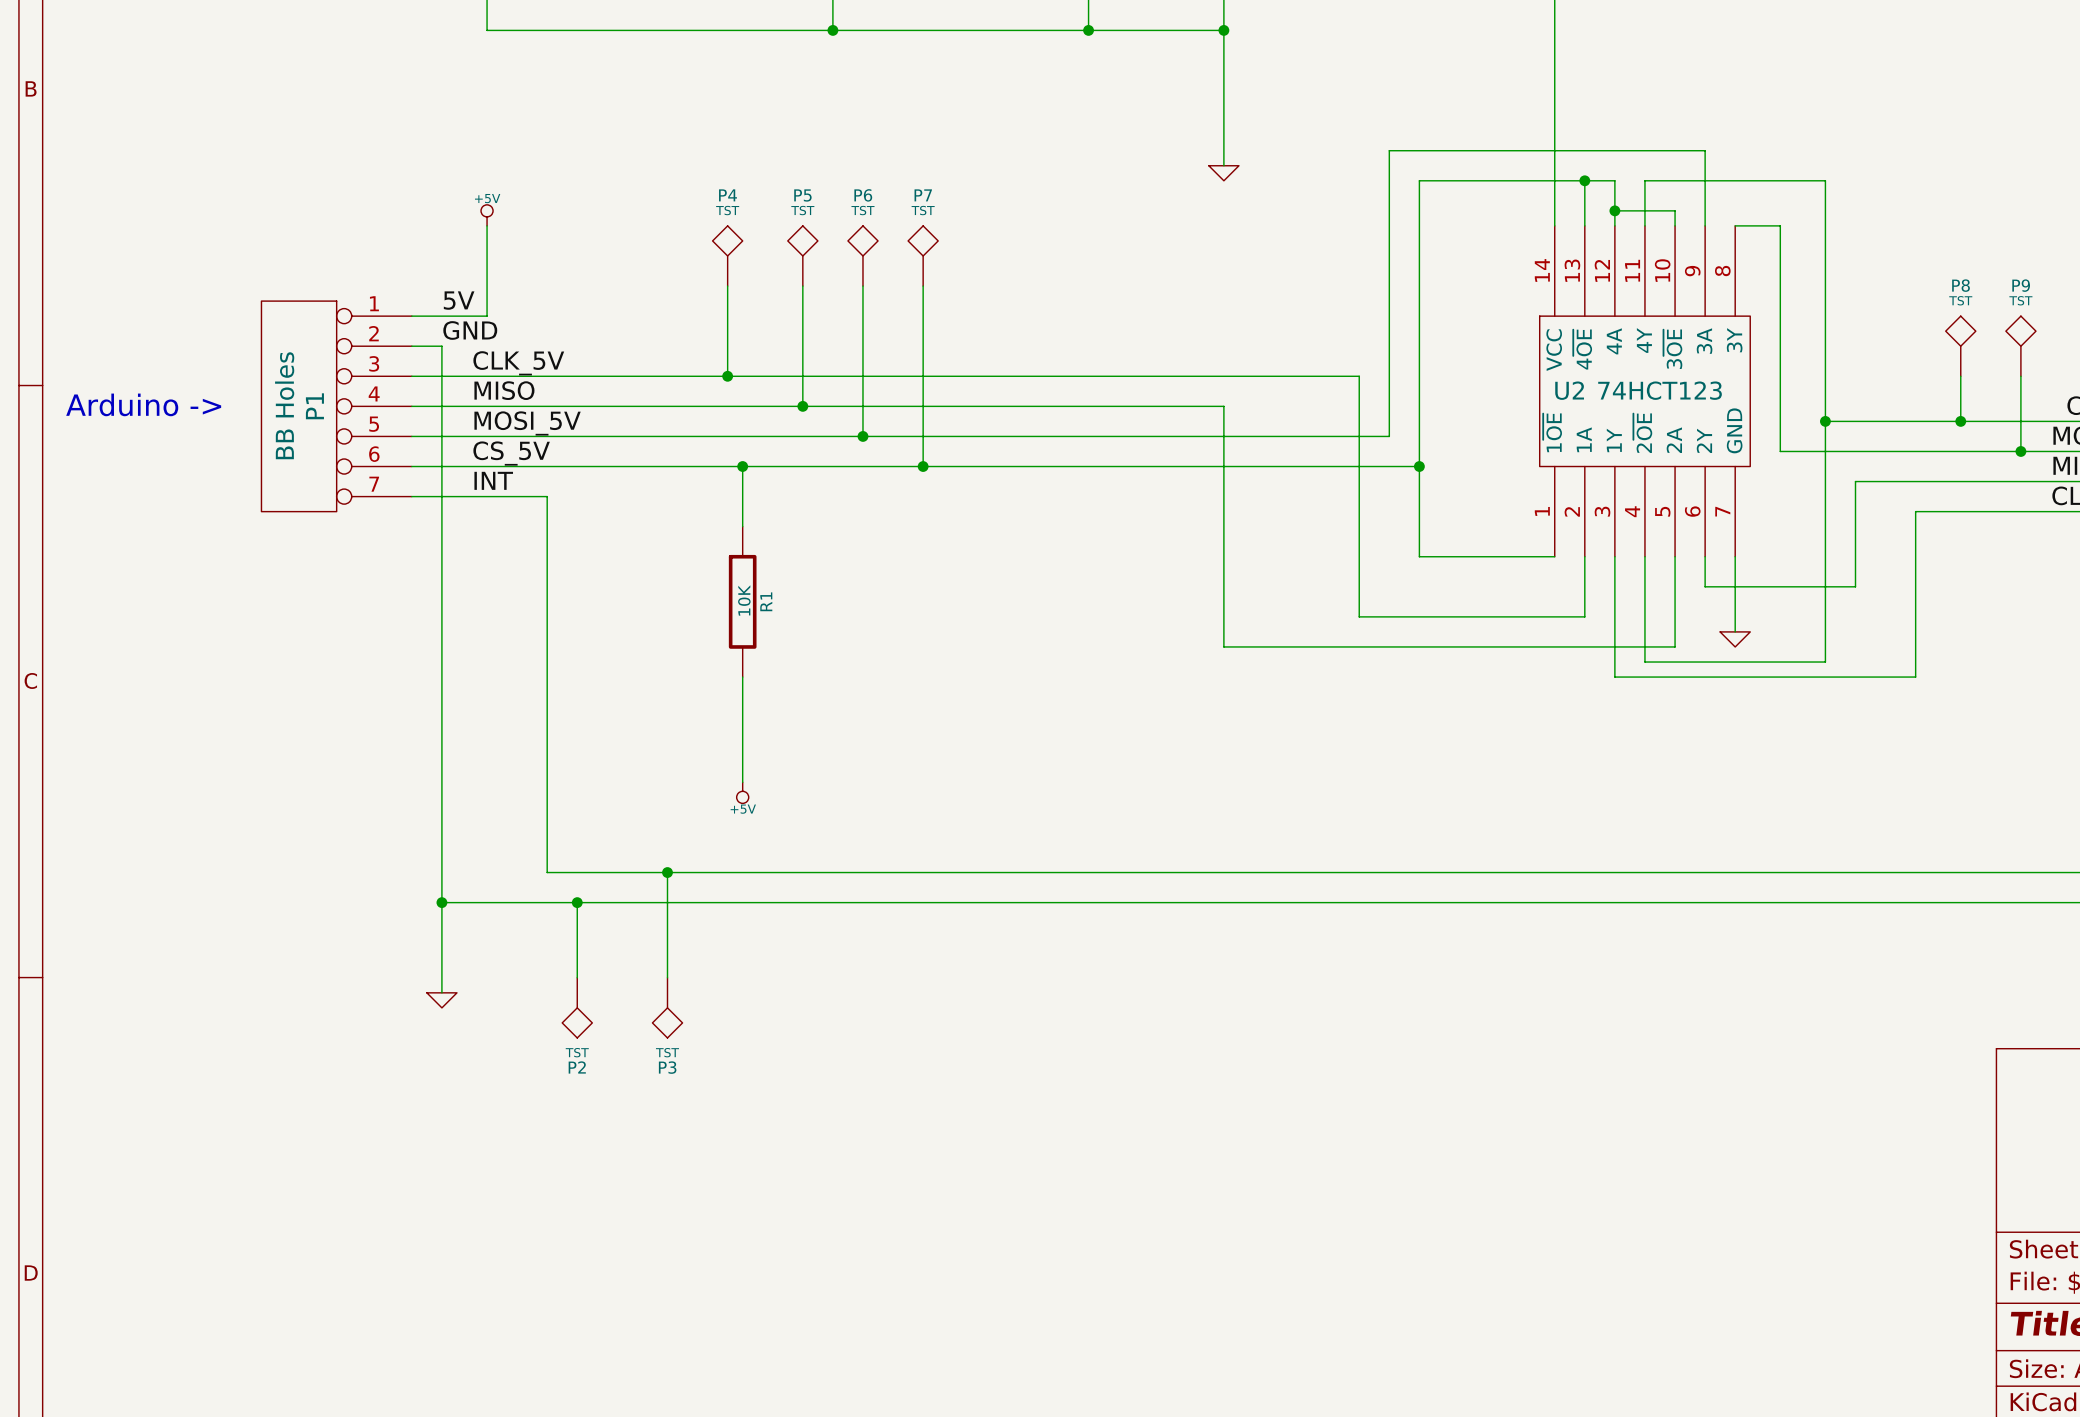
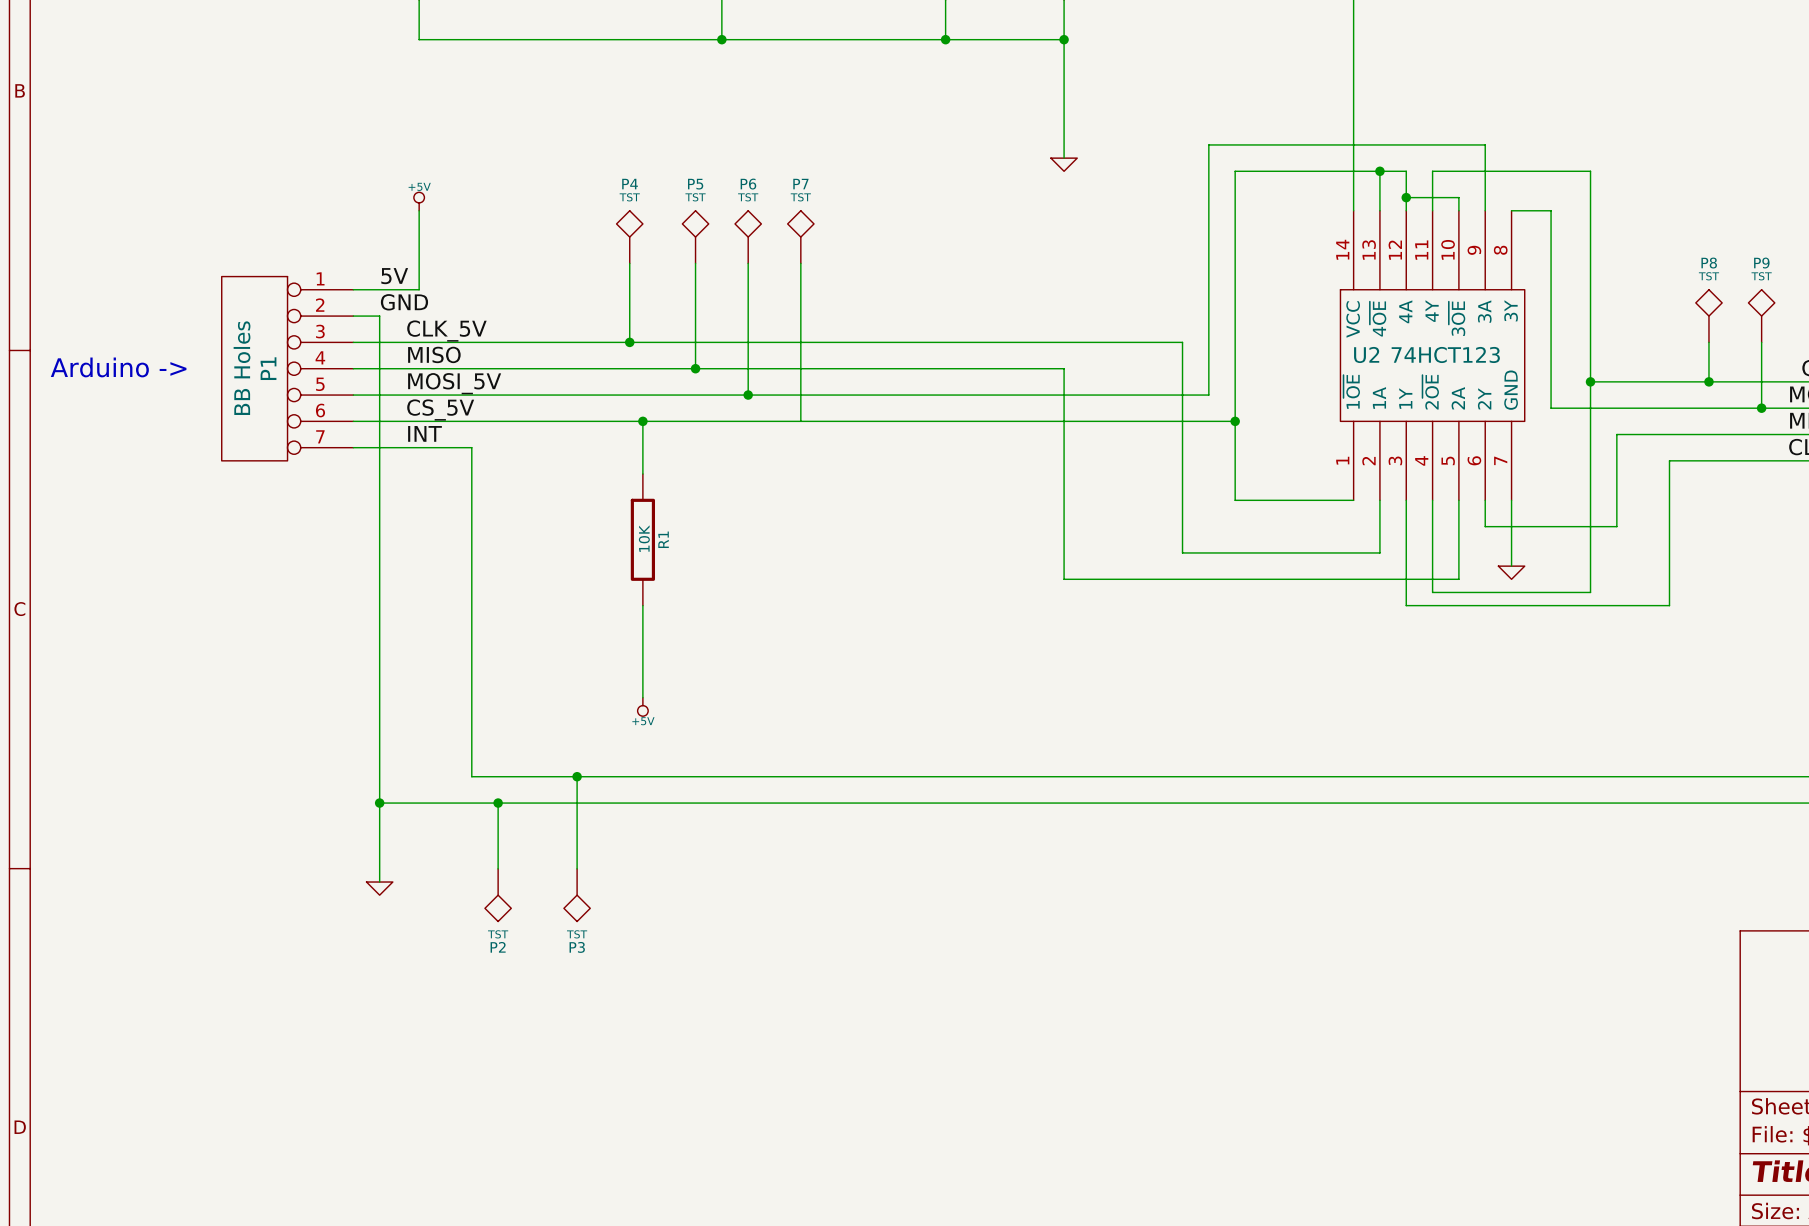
junction: (923, 466) -> none

